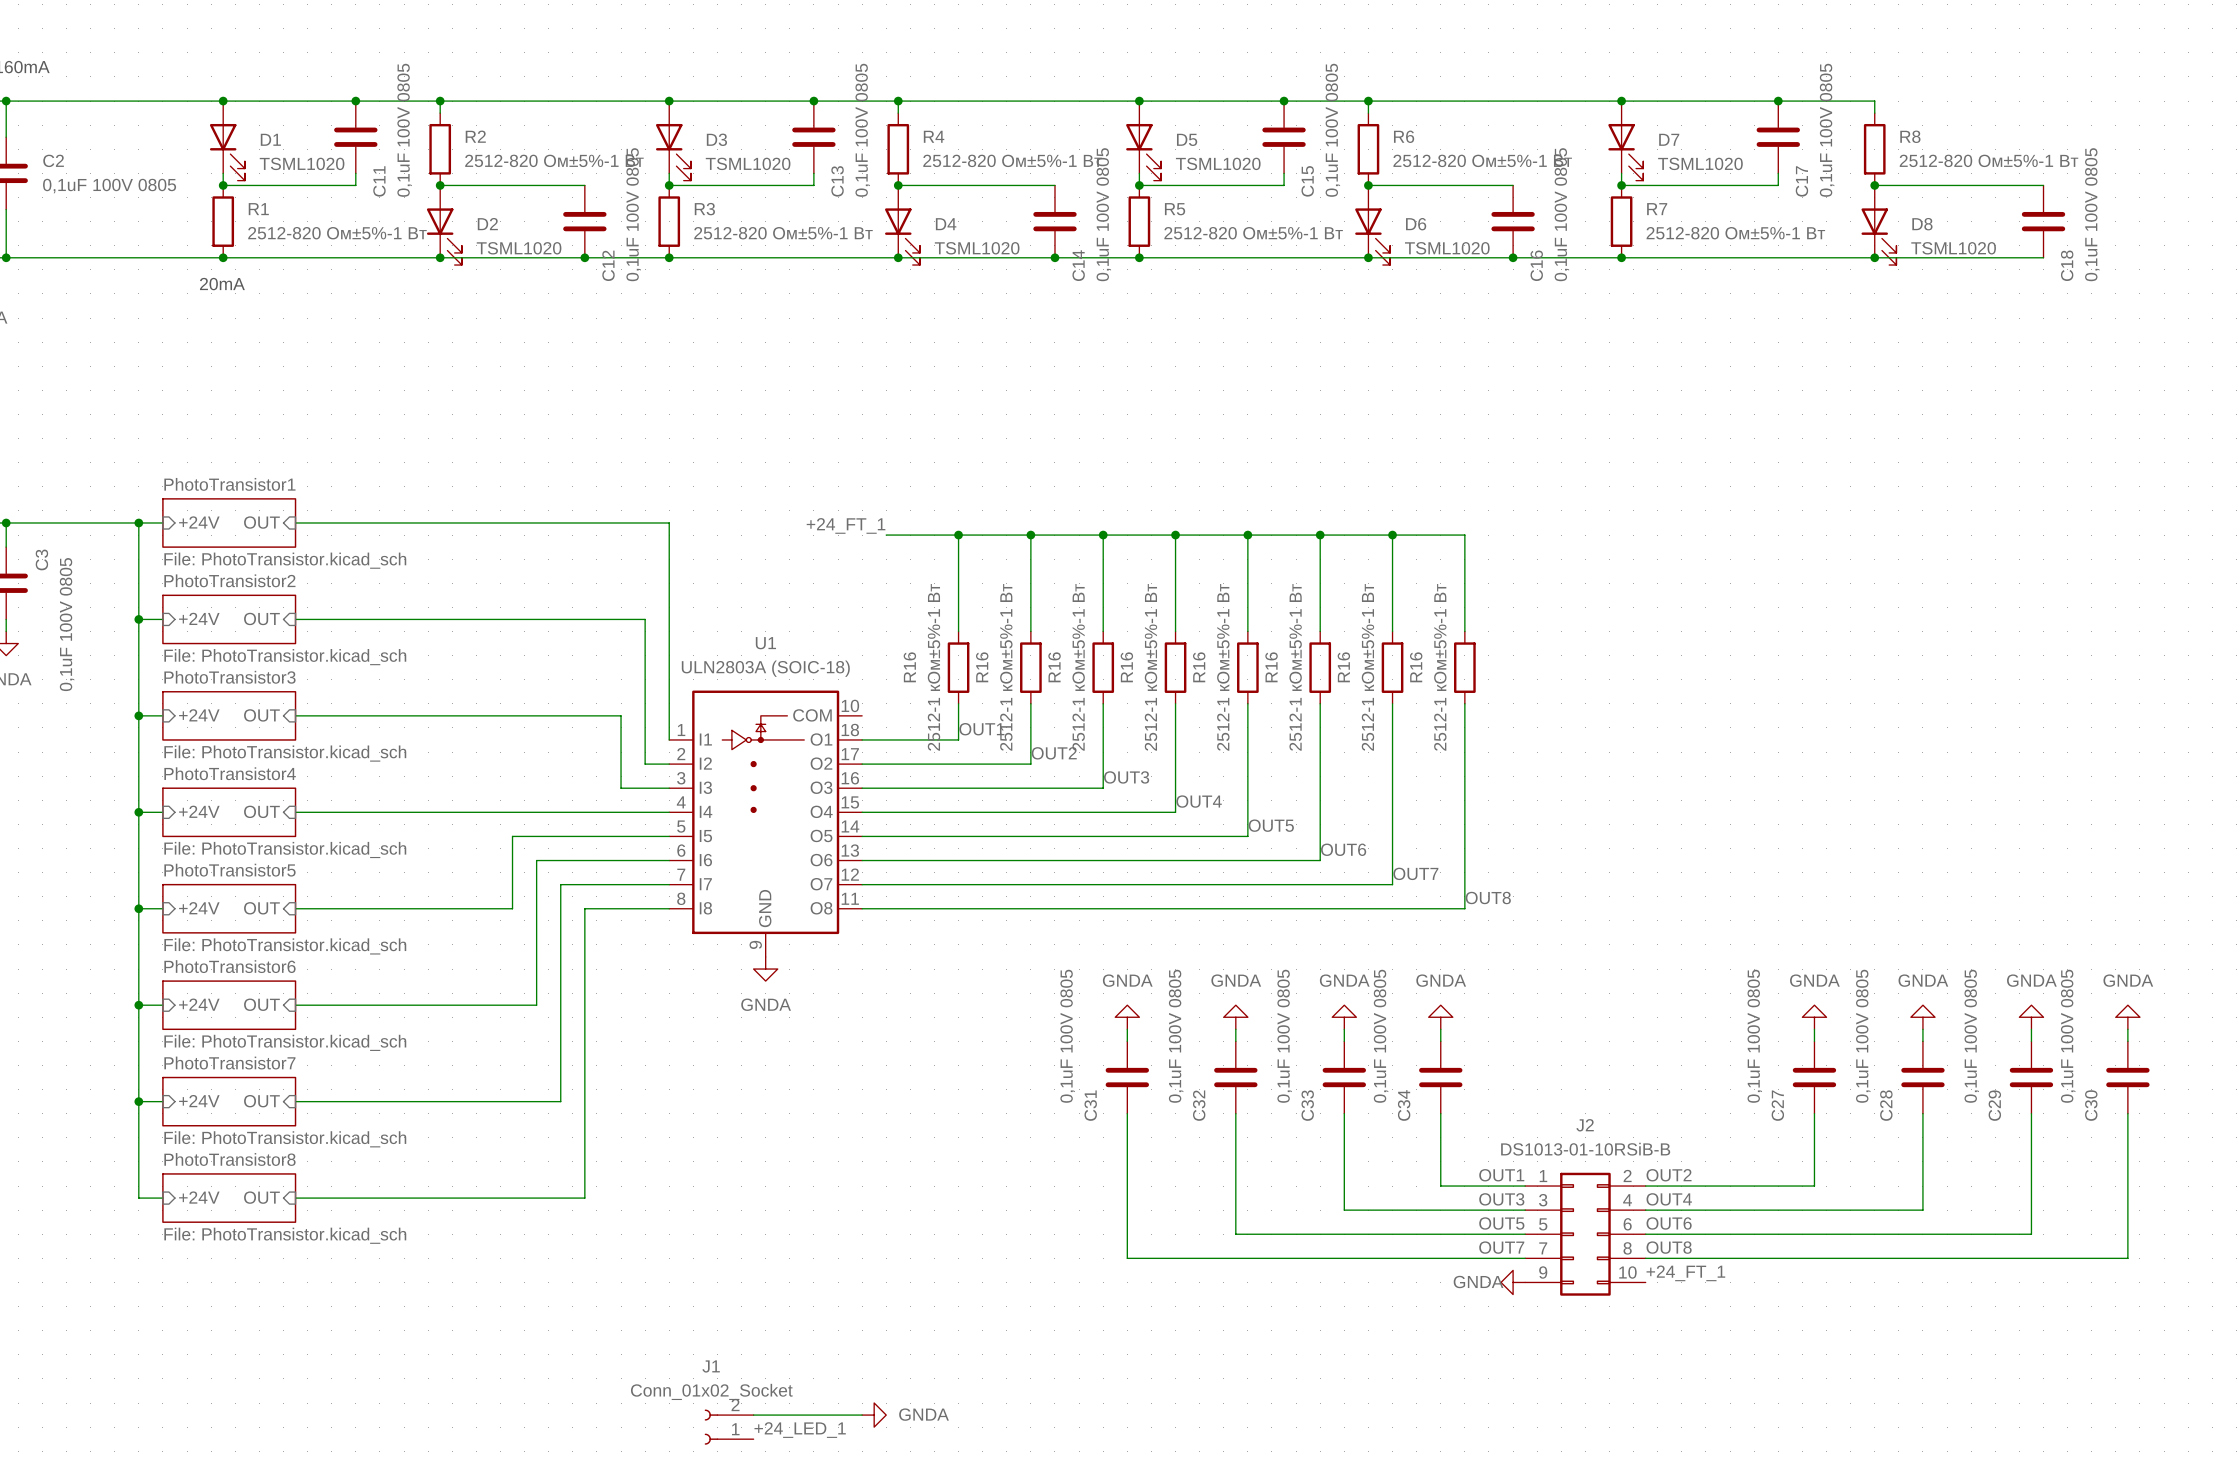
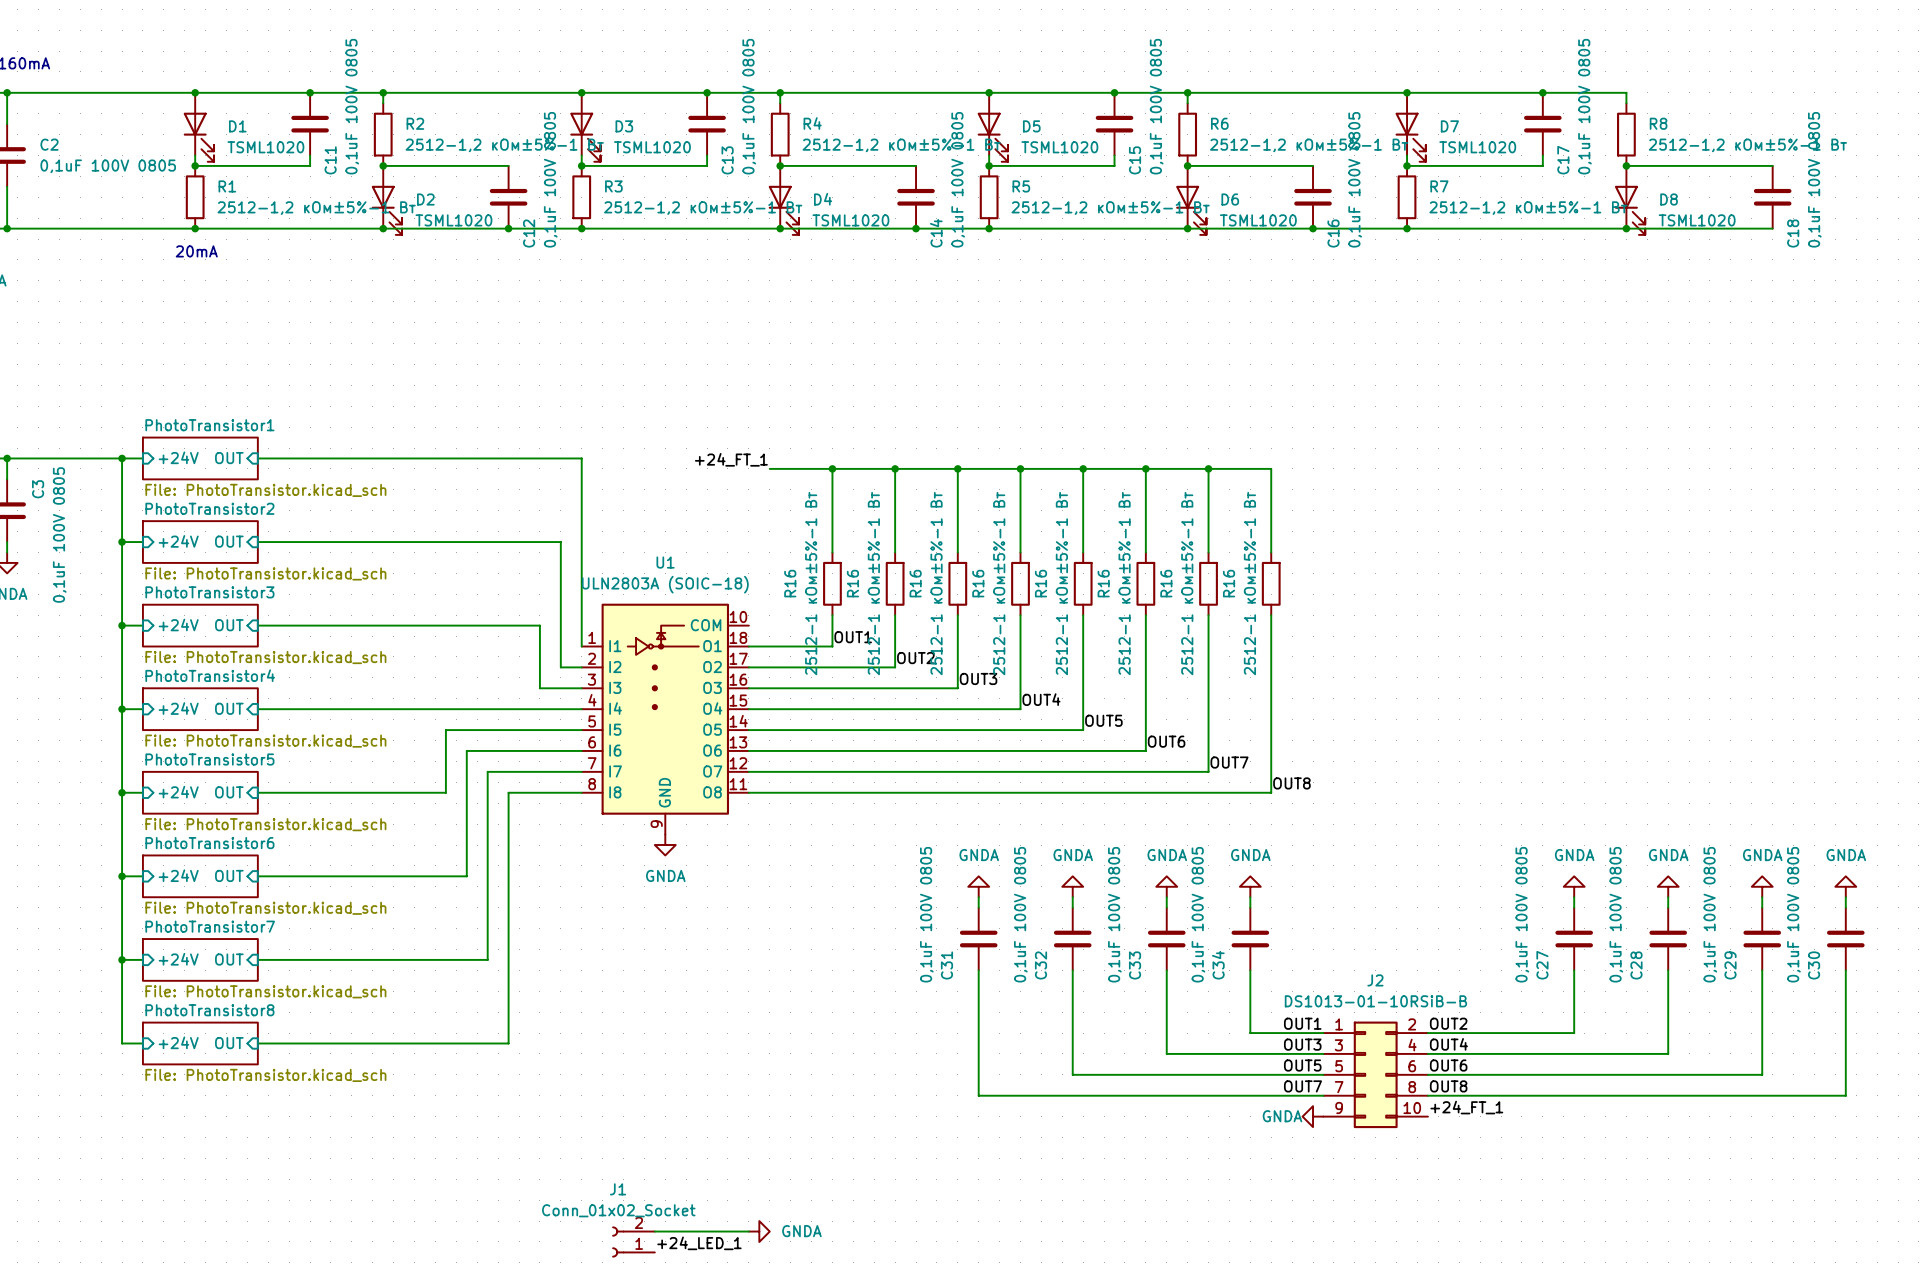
R2 value: 2512-820 Ом±5%-1 Вт (554, 160) -> 2512-1,2 кОм±5%-1 Вт (504, 145)
R4 value: 2512-820 Ом±5%-1 Вт (1012, 160) -> 2512-1,2 кОм±5%-1 Вт (901, 145)
R6 value: 2512-820 Ом±5%-1 Вт (1482, 160) -> 2512-1,2 кОм±5%-1 Вт (1309, 145)
R8 value: 2512-820 Ом±5%-1 Вт (1988, 160) -> 2512-1,2 кОм±5%-1 Вт (1747, 145)
R1 value: 2512-820 Ом±5%-1 Вт (337, 233) -> 2512-1,2 кОм±5%-1 Вт (316, 208)
R3 value: 2512-820 Ом±5%-1 Вт (783, 233) -> 2512-1,2 кОм±5%-1 Вт (703, 208)
R5 value: 2512-820 Ом±5%-1 Вт (1253, 233) -> 2512-1,2 кОм±5%-1 Вт (1110, 208)
R7 value: 2512-820 Ом±5%-1 Вт (1735, 233) -> 2512-1,2 кОм±5%-1 Вт (1528, 208)

